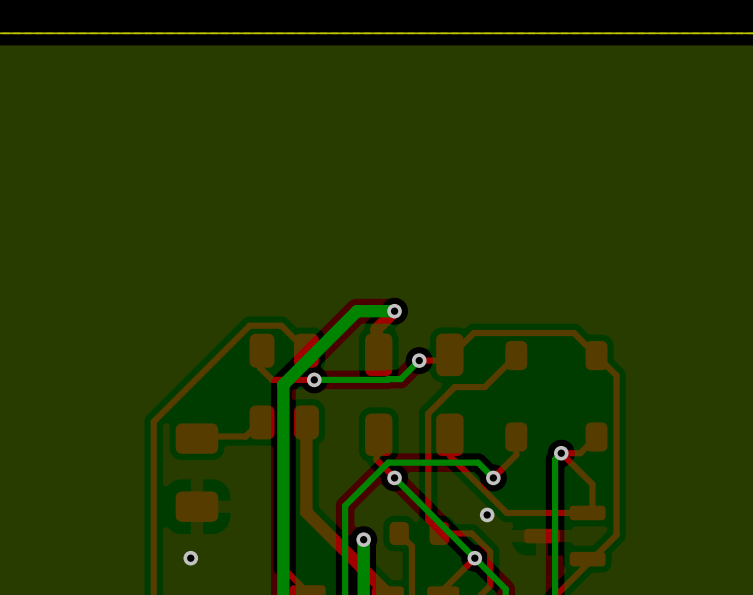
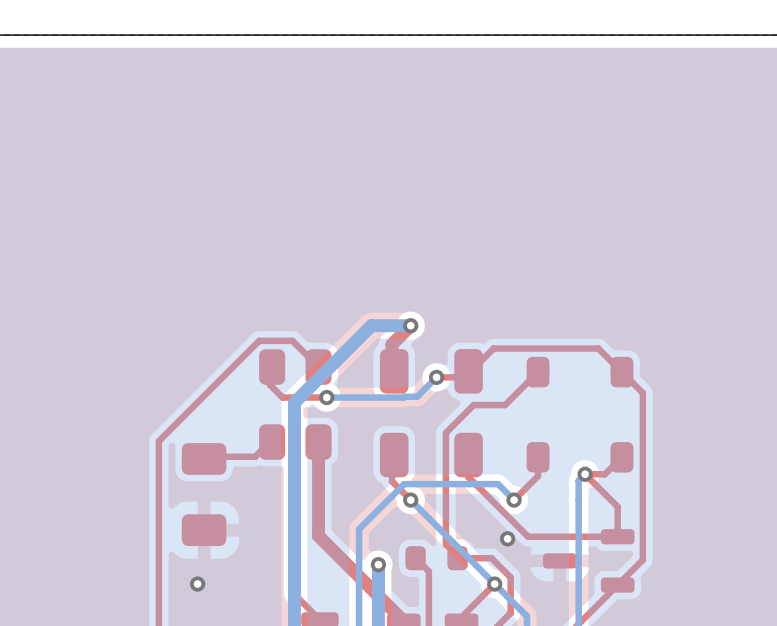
part footprint: [524, 505, 606, 567] -> [543, 529, 635, 593]

